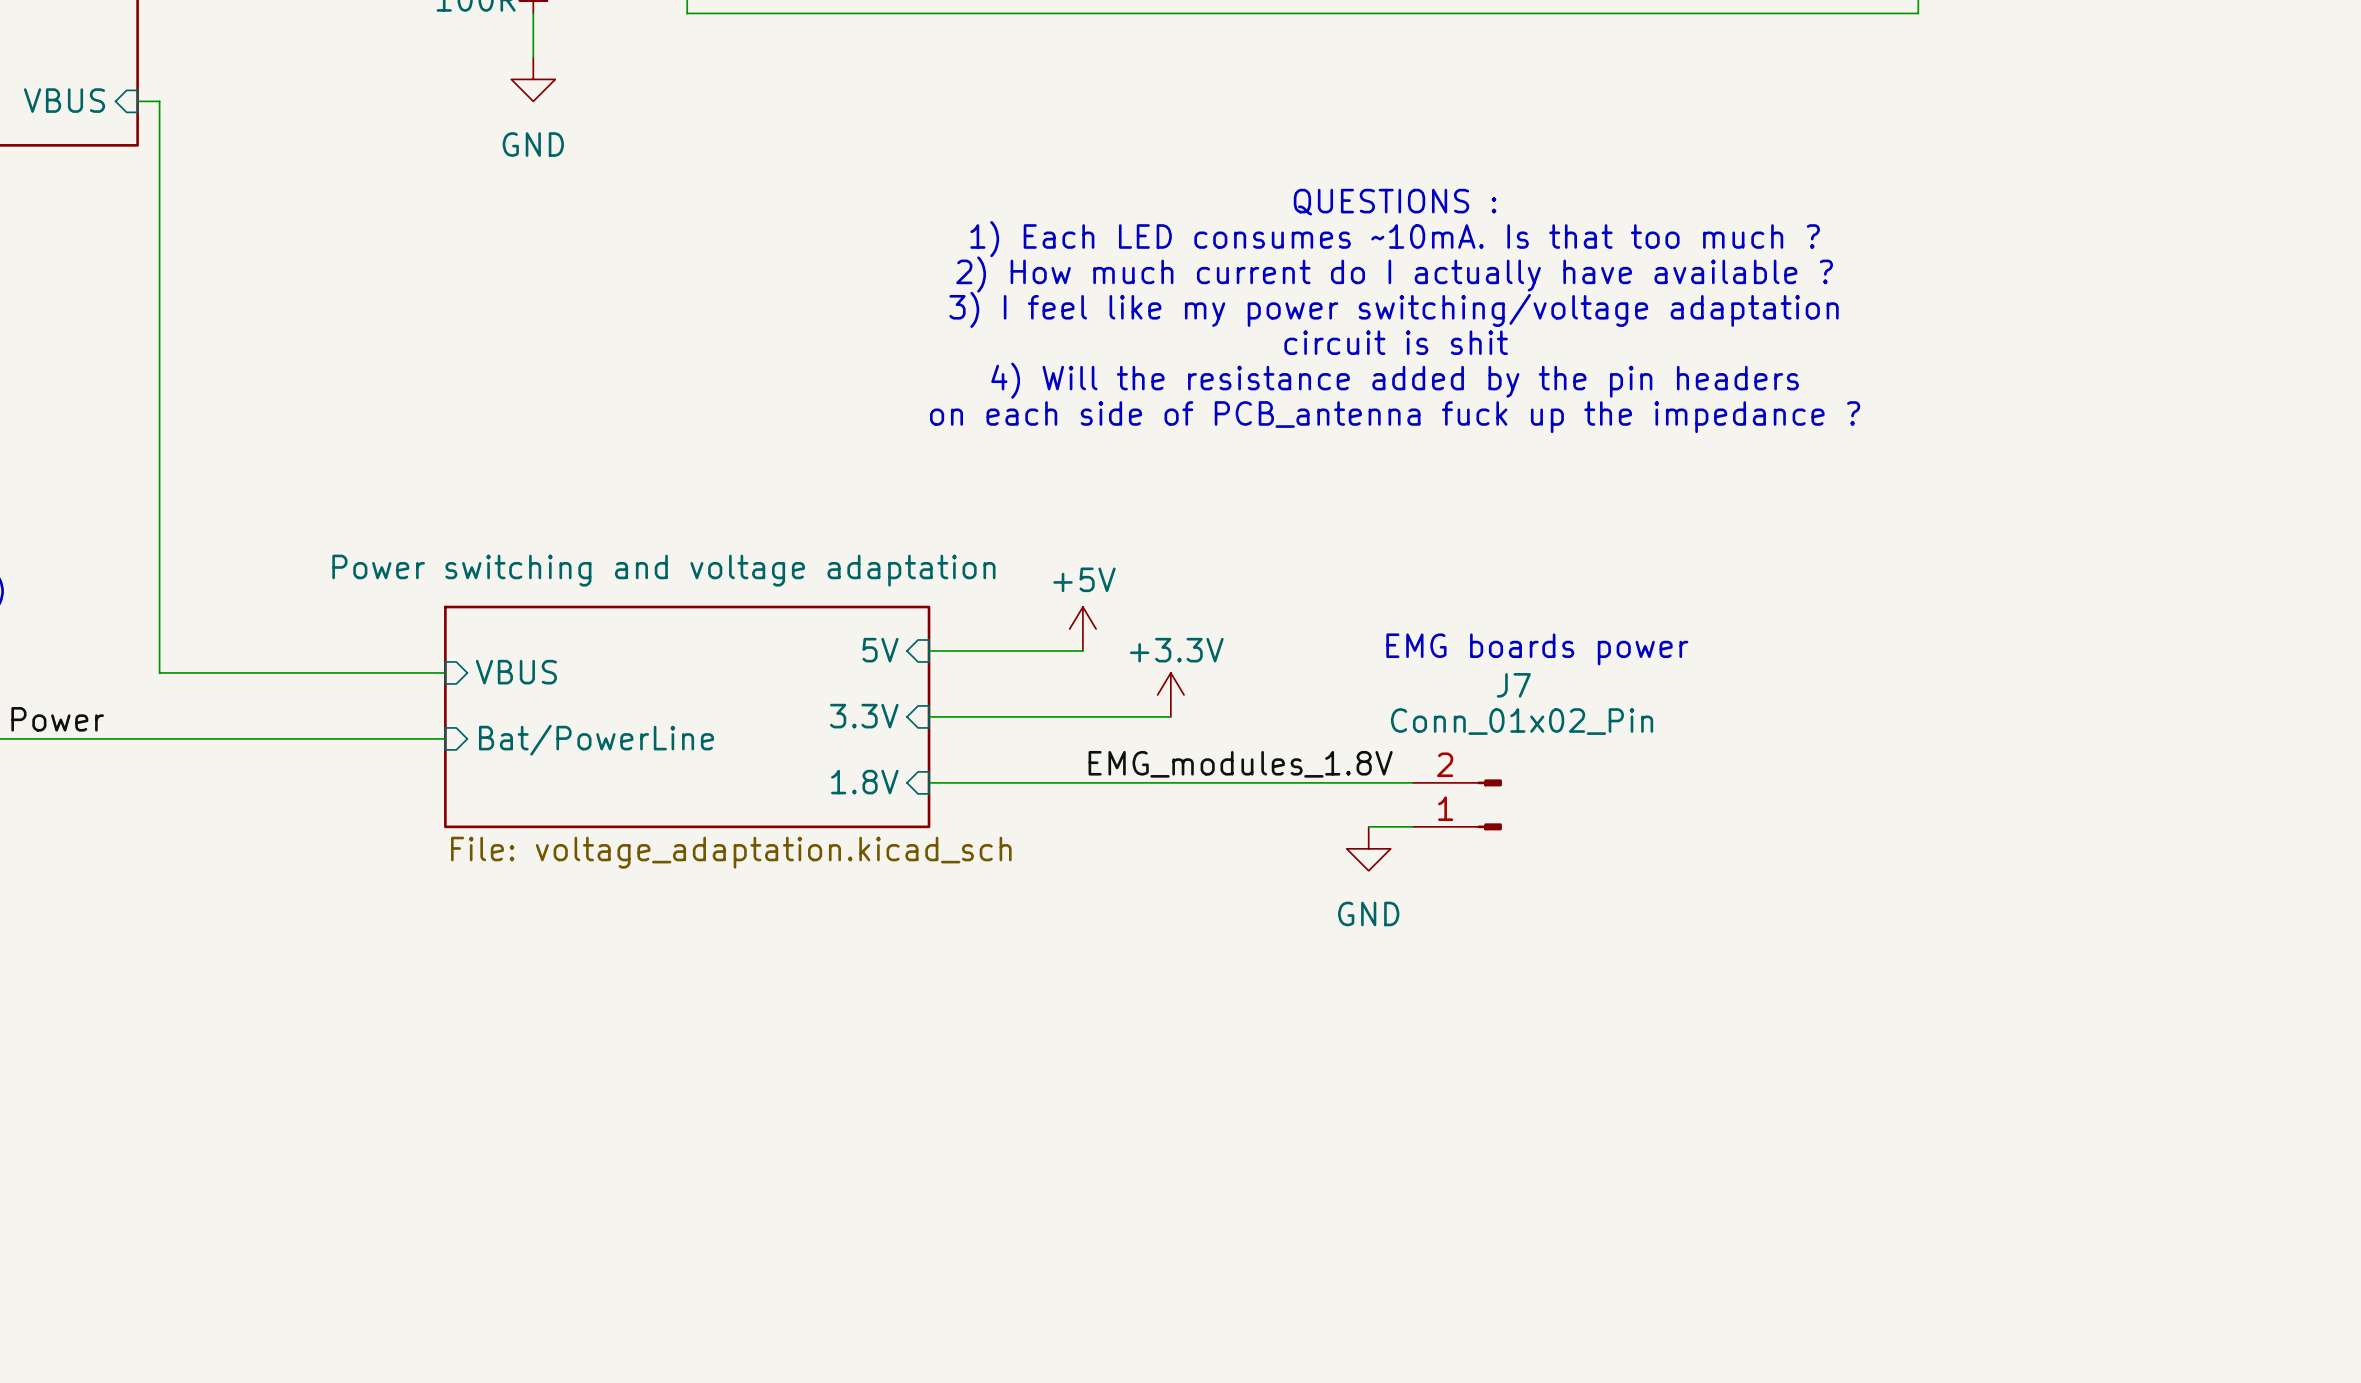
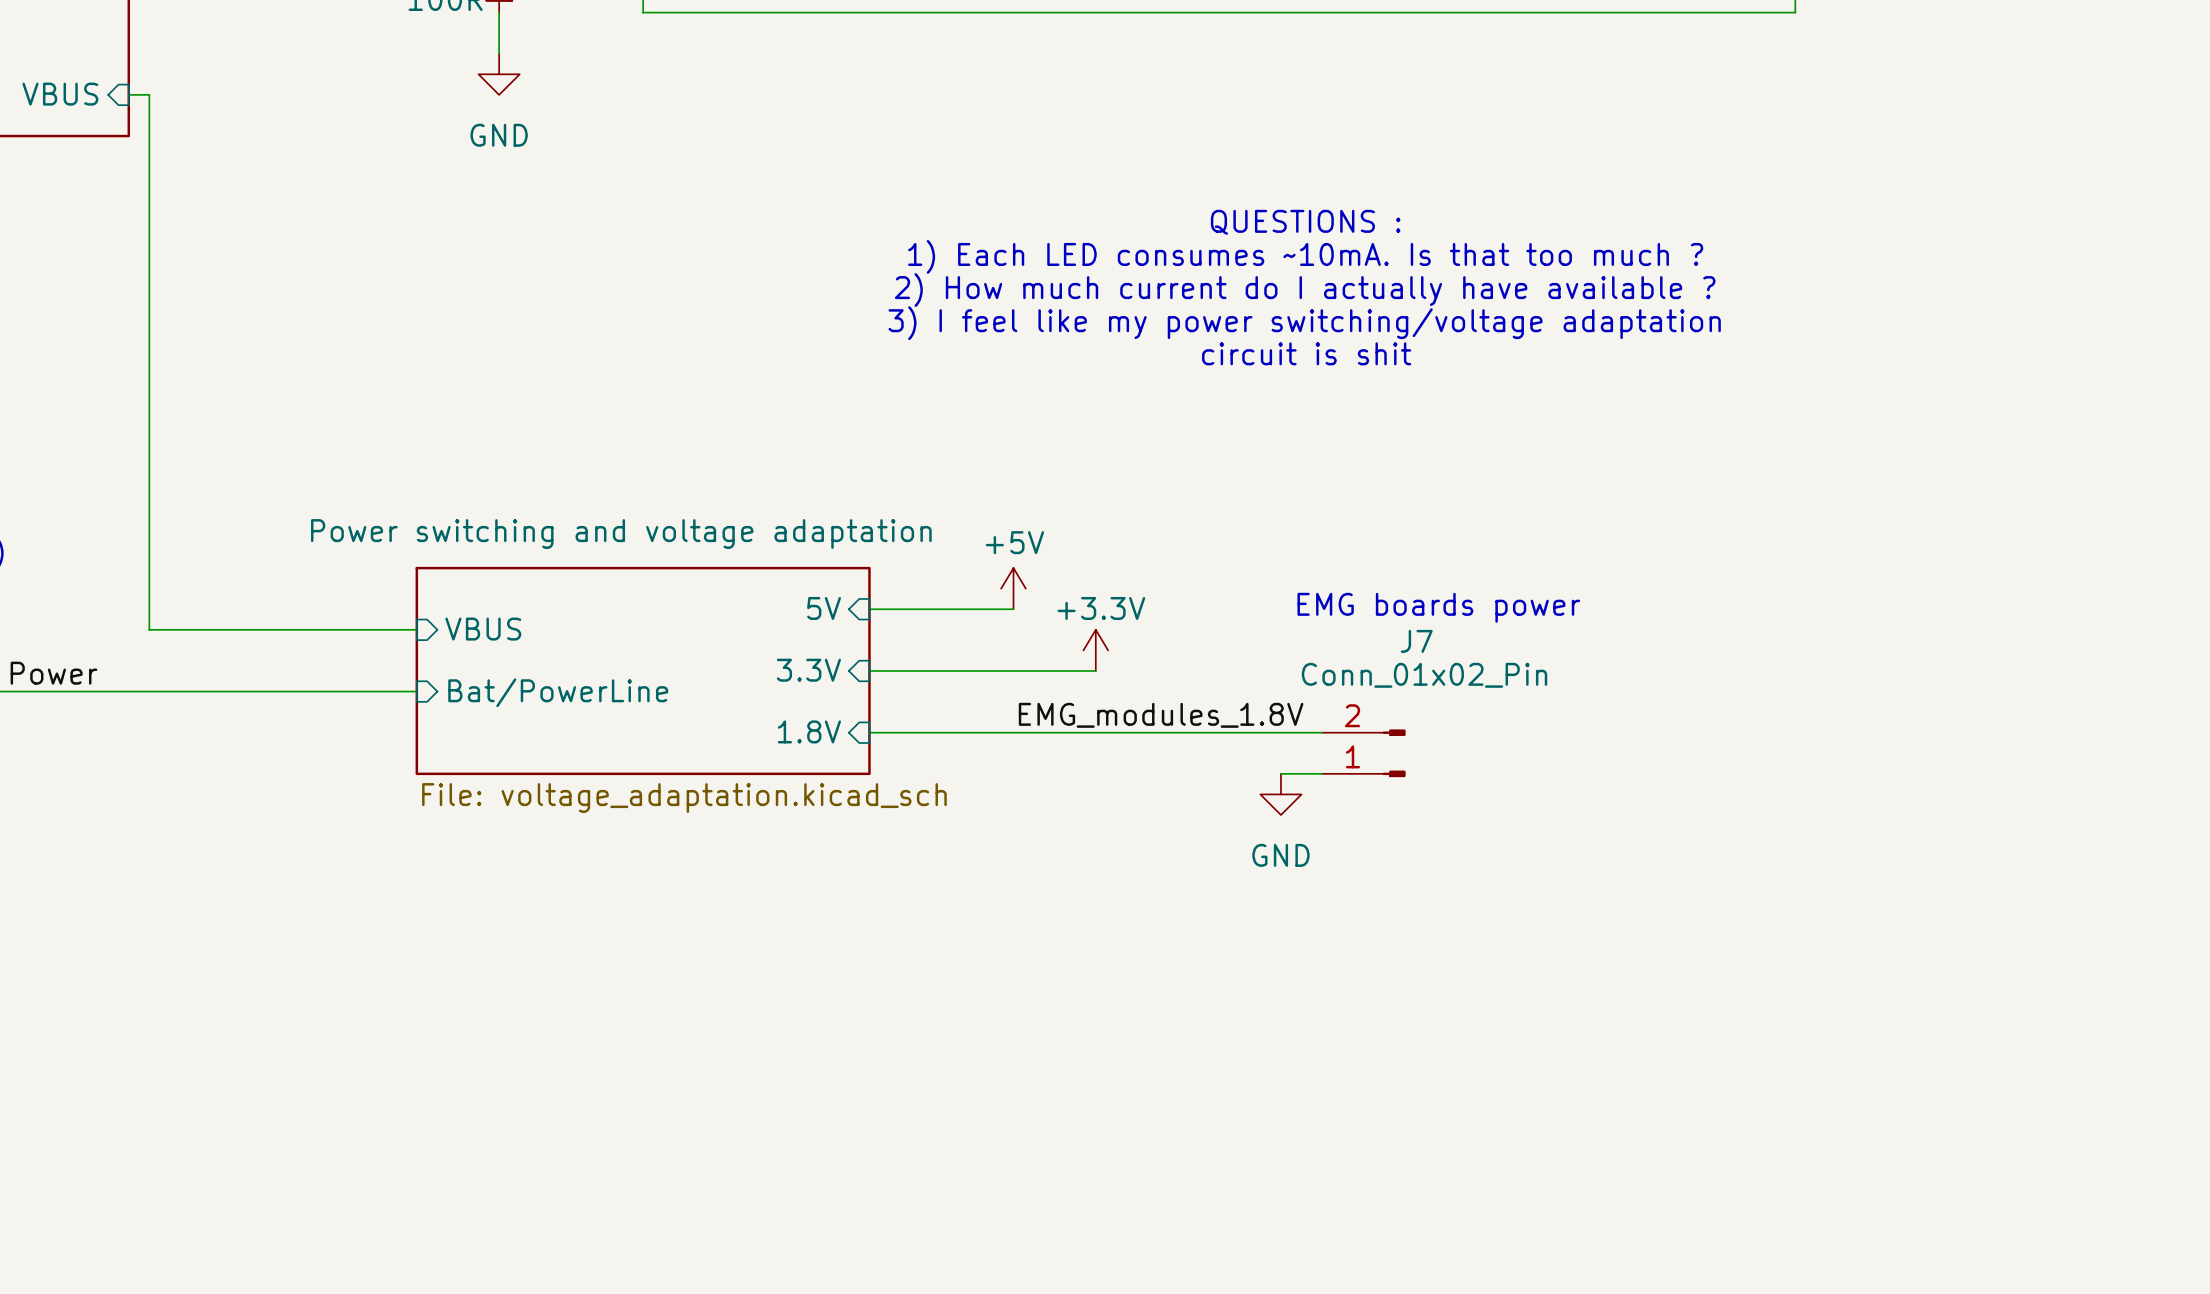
text: QUESTIONS : (1395, 202) -> none
text: 1) Each LED consumes ~10mA. Is that too much ? (1395, 239) -> QUESTIONS : (1305, 222)
text: 2) How much current do I actually have available ? (1394, 274) -> 1) Each LED consumes ~10mA. Is that too much ? (1305, 256)
text: 3) I feel like my power switching/voltage adaptation (1394, 309) -> 2) How much current do I actually have available ? (1305, 290)
text: circuit is shit (1396, 342) -> 3) I feel like my power switching/voltage adaptation (1304, 323)
text: 4) Will the resistance added by the pin headers (1395, 380) -> circuit is shit (1306, 353)
text: on each side of PCB_antenna fuck up the impedance ? (1395, 417) -> none

